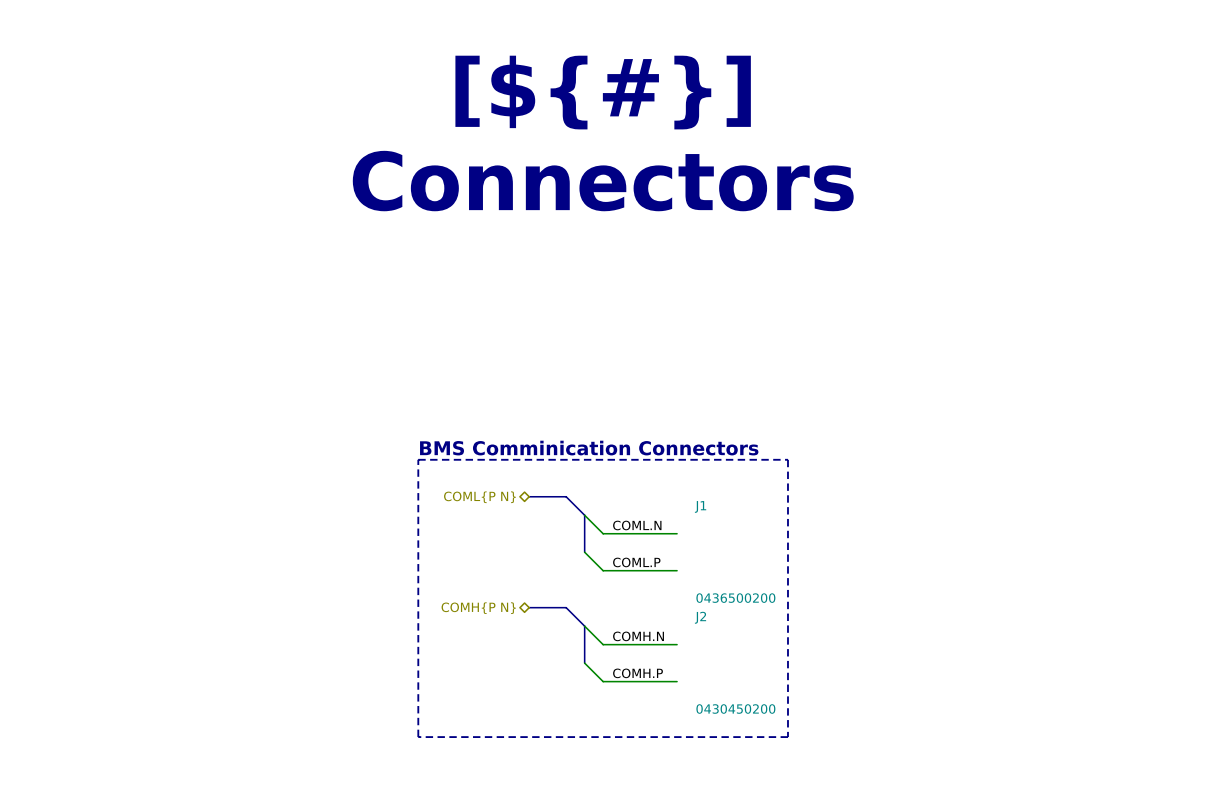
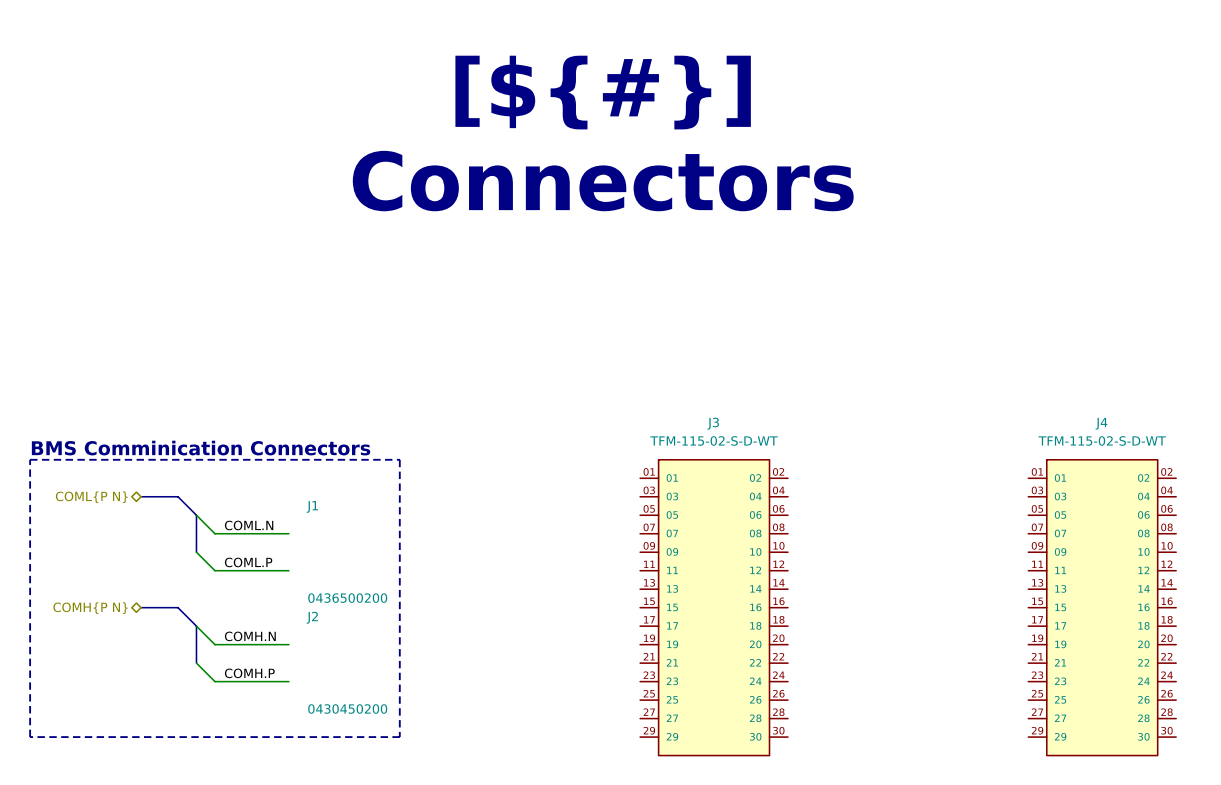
text: none -> BMS Comminication Connectors (201, 448)
text: BMS Comminication Connectors (589, 448) -> none
line: none -> (30, 459) (399, 459) (399, 737) (30, 737) (30, 459)
line: (418, 459) (787, 459) (787, 737) (418, 737) (418, 459) -> none
bus: none -> (141, 496) (177, 496) (196, 515) (196, 552)
bus: (529, 496) (566, 496) (584, 515) (584, 552) -> none
hierarchical label: none -> COML{P N} (91, 497)
hierarchical label: COML{P N} (479, 497) -> none
wire: none -> (196, 515) (214, 533) (288, 533)
wire: (584, 515) (603, 533) (677, 533) -> none
label: none -> COML.N (249, 525)
label: COML.N (637, 525) -> none
J1 position: (735, 551) -> (346, 551)
wire: none -> (196, 552) (214, 570) (288, 570)
wire: (584, 552) (603, 570) (677, 570) -> none
label: none -> COML.P (248, 562)
label: COML.P (636, 562) -> none
bus: none -> (141, 607) (177, 607) (196, 626) (196, 663)
bus: (529, 607) (566, 607) (584, 626) (584, 663) -> none
J3: none -> TFM-115-02-S-D-WT (714, 607)
J4: none -> TFM-115-02-S-D-WT (1102, 607)
hierarchical label: none -> COMH{P N} (90, 608)
hierarchical label: COMH{P N} (478, 608) -> none
wire: none -> (196, 626) (214, 644) (288, 644)
wire: (584, 626) (603, 644) (677, 644) -> none
label: none -> COMH.N (250, 636)
label: COMH.N (638, 636) -> none
J2 position: (735, 662) -> (346, 662)
wire: none -> (196, 663) (214, 681) (288, 681)
wire: (584, 663) (603, 681) (677, 681) -> none
label: none -> COMH.P (249, 673)
label: COMH.P (638, 673) -> none

